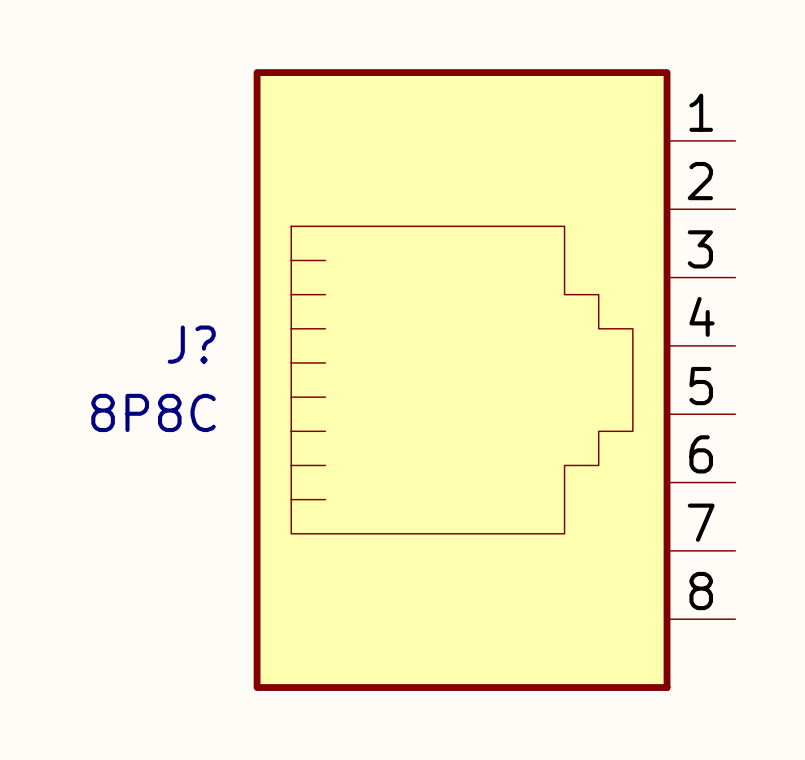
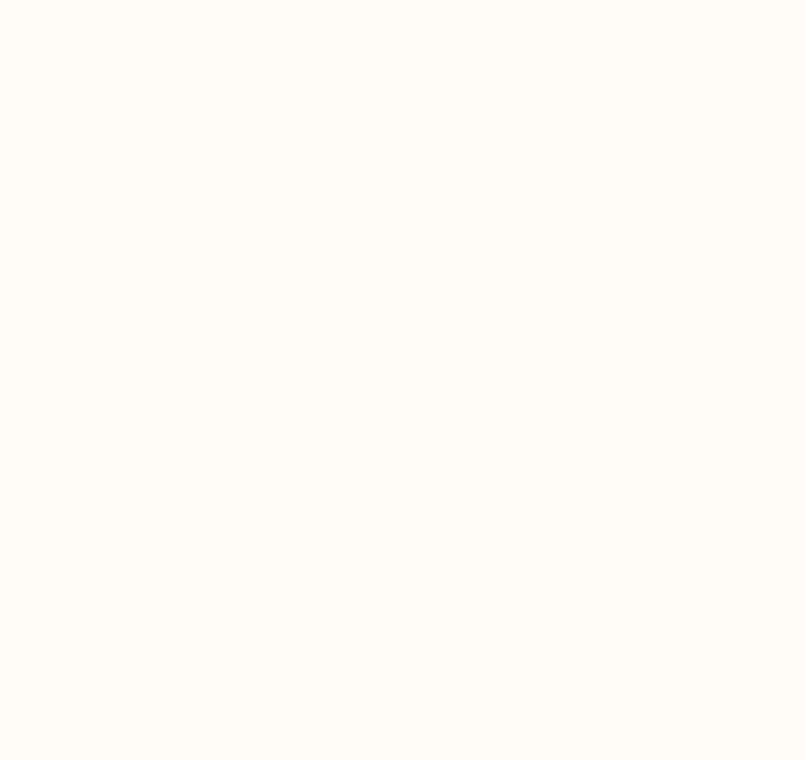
J?: 8P8C (494, 380) -> none

